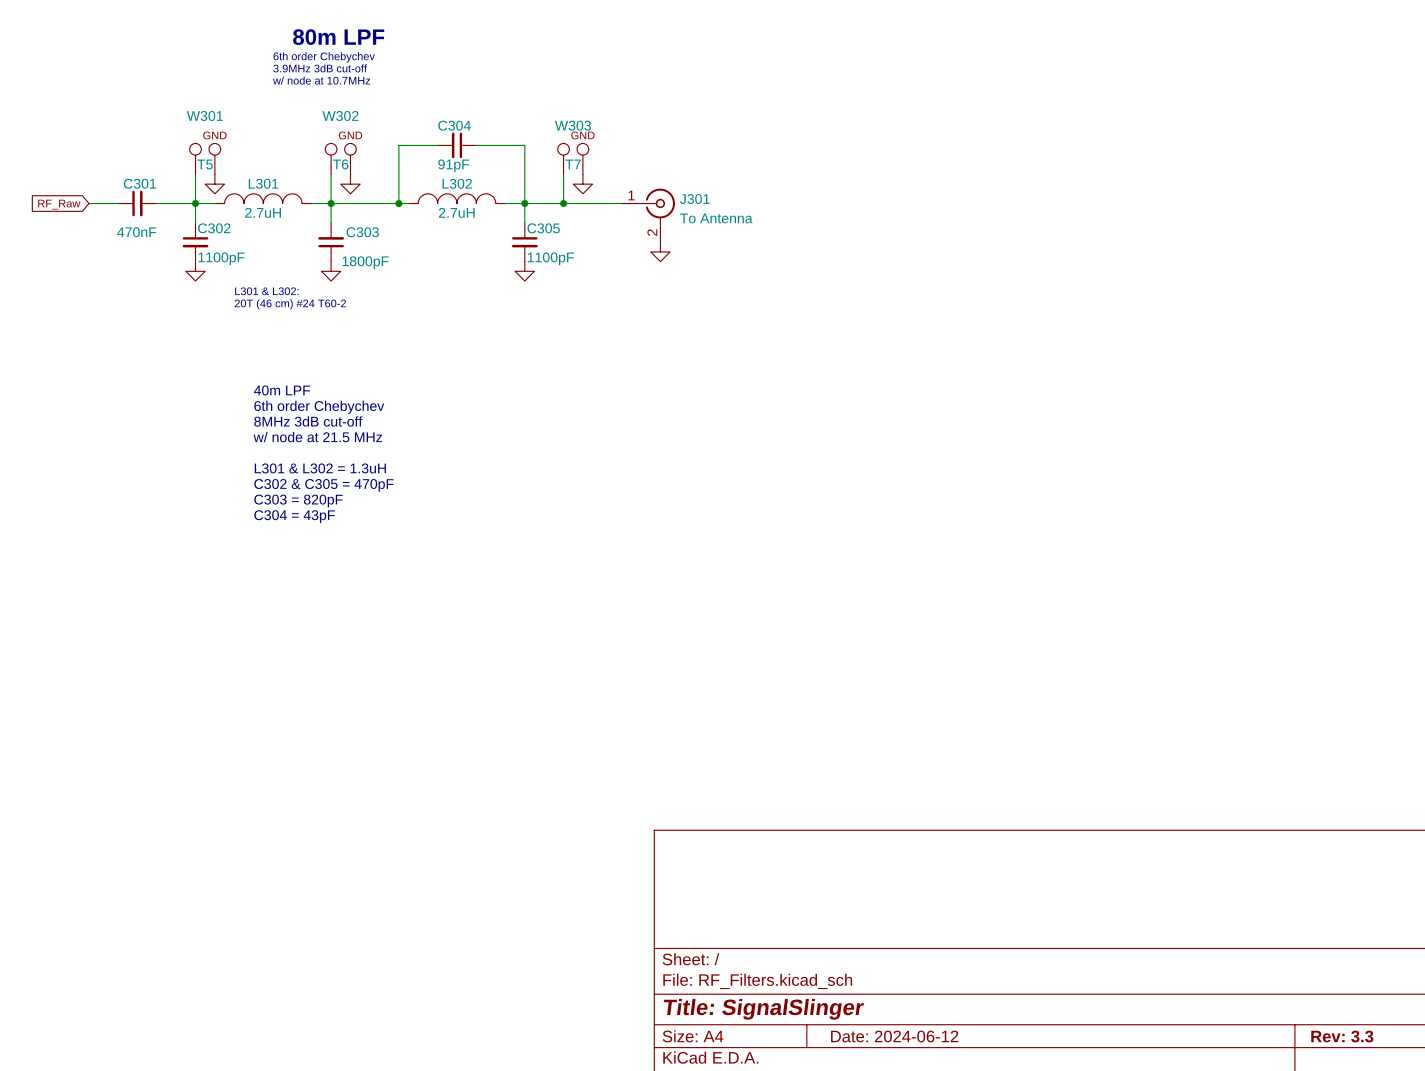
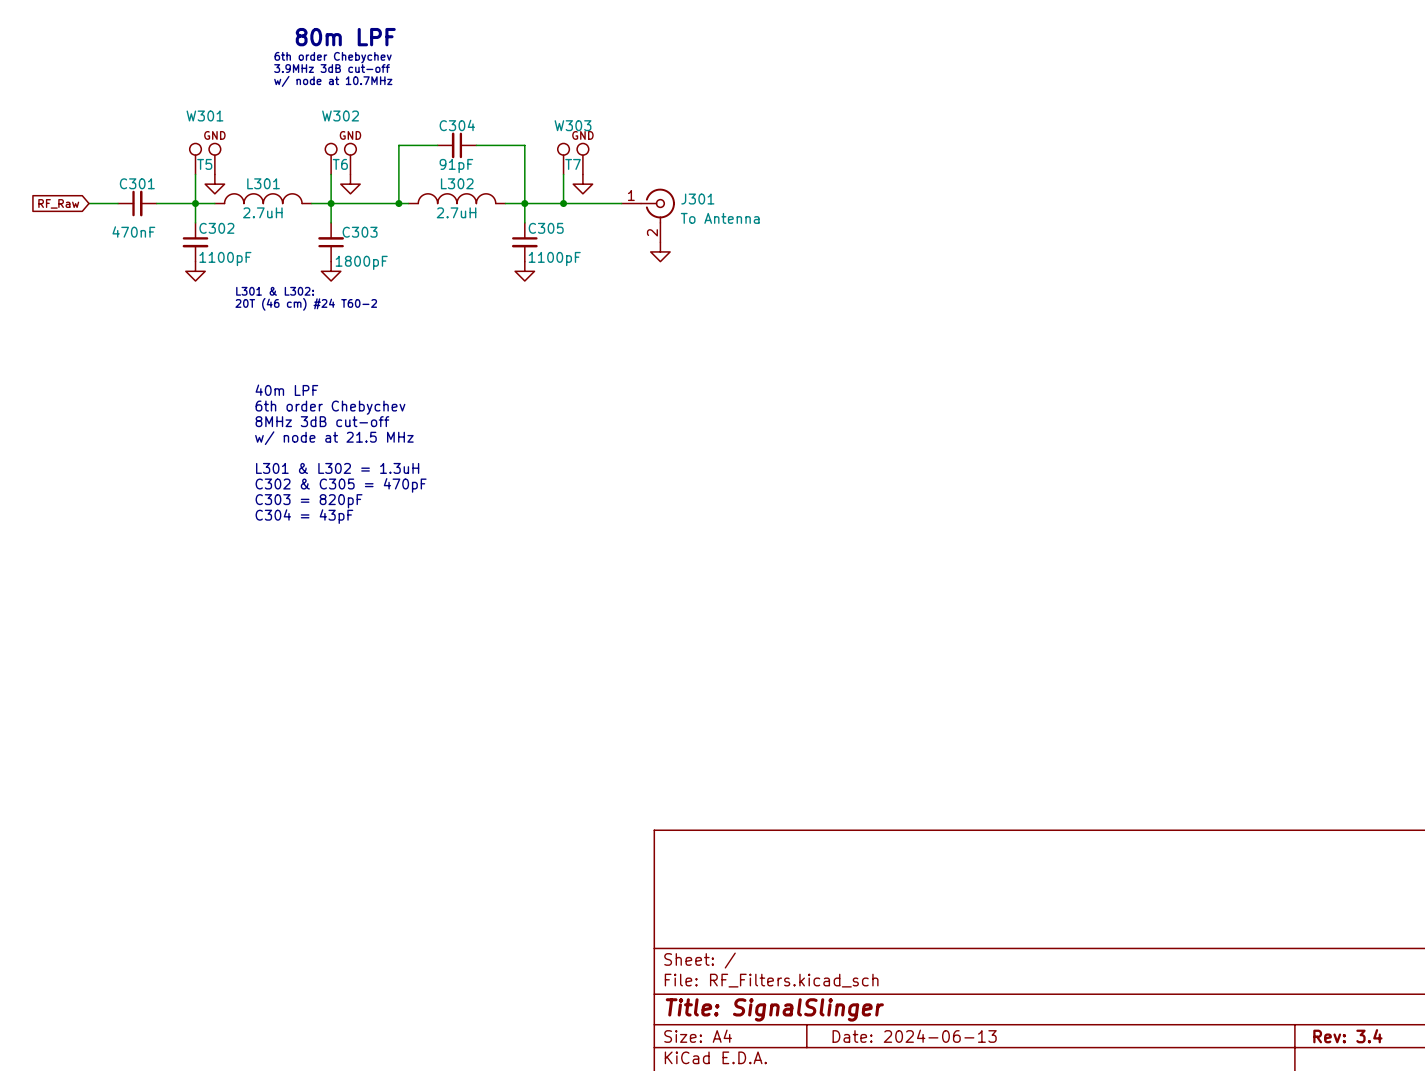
title block: Date: 2024-06-12 (894, 1036) -> Date: 2024-06-13 (914, 1036)
title block: Rev: 3.3 (1342, 1036) -> Rev: 3.4 (1347, 1036)

